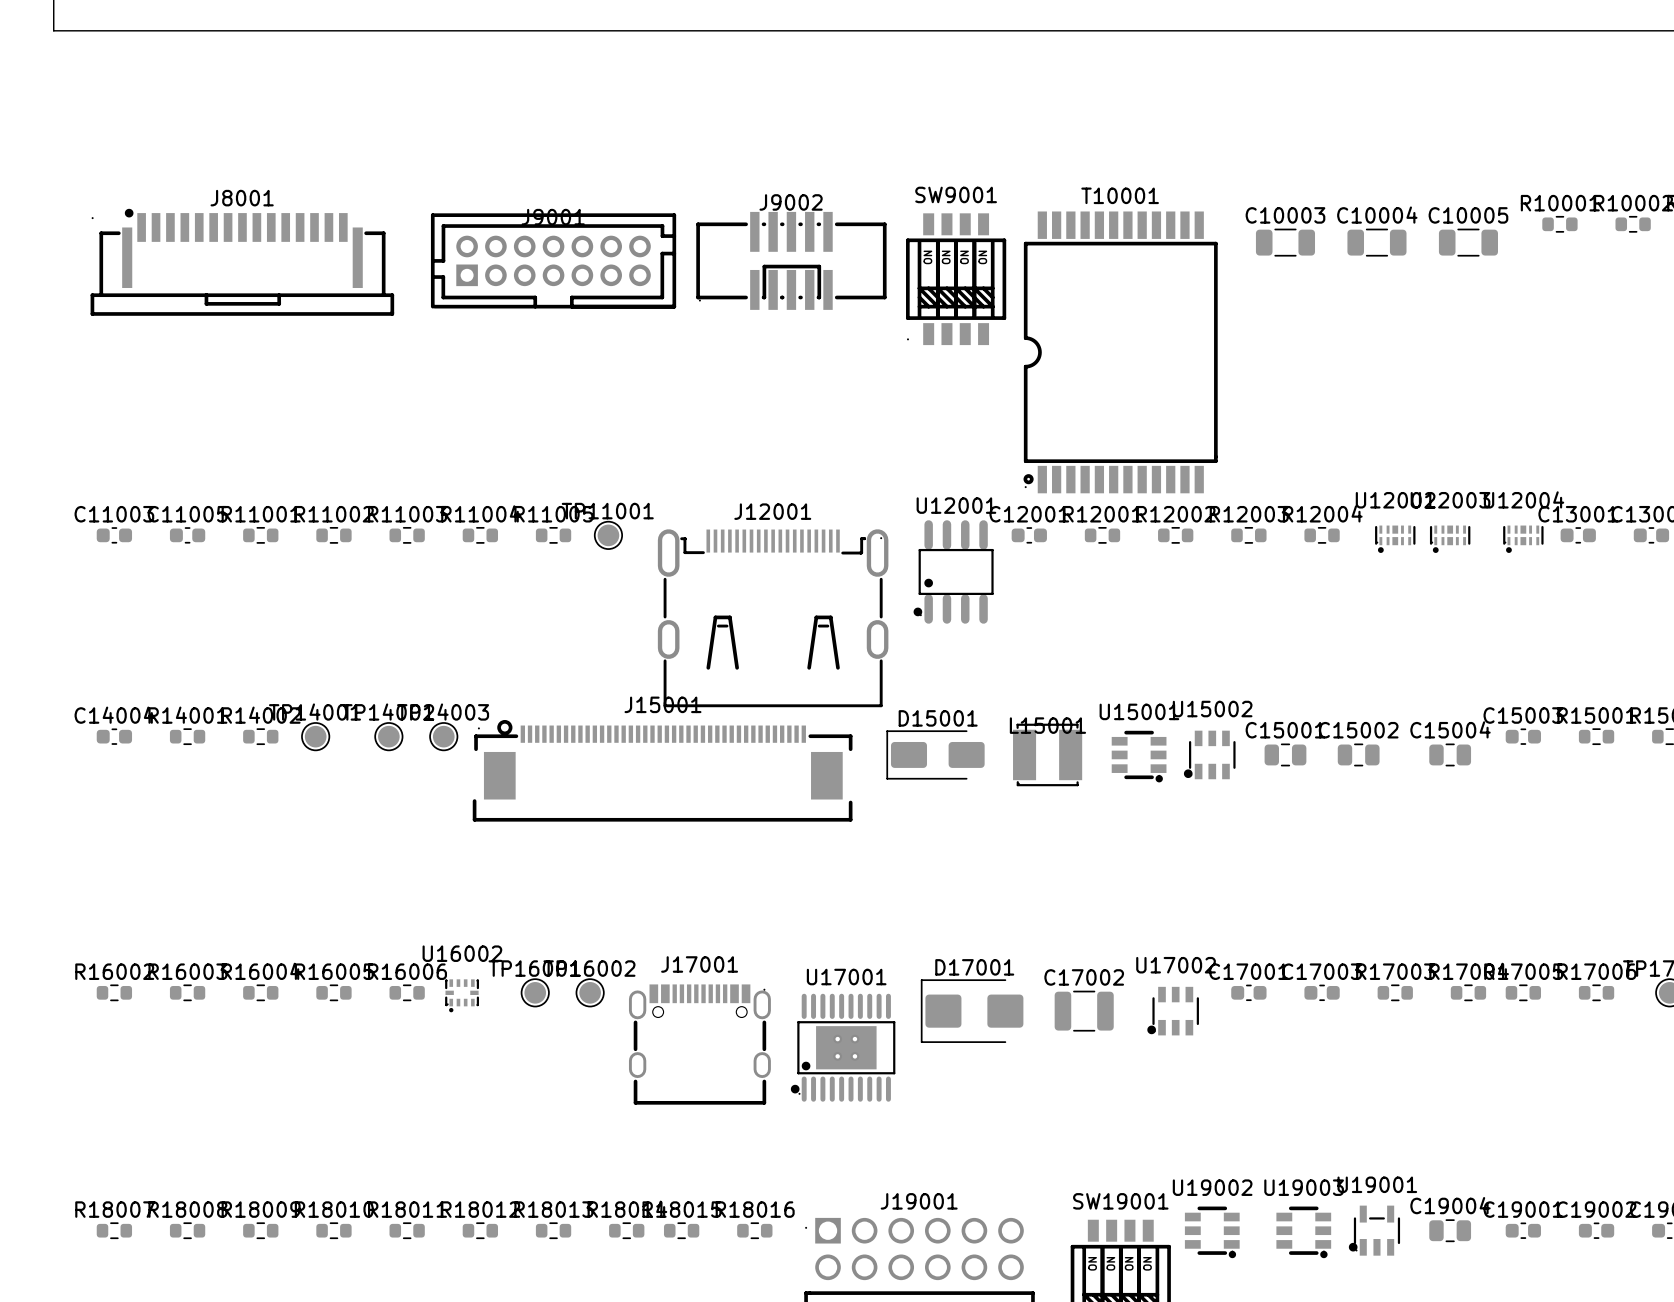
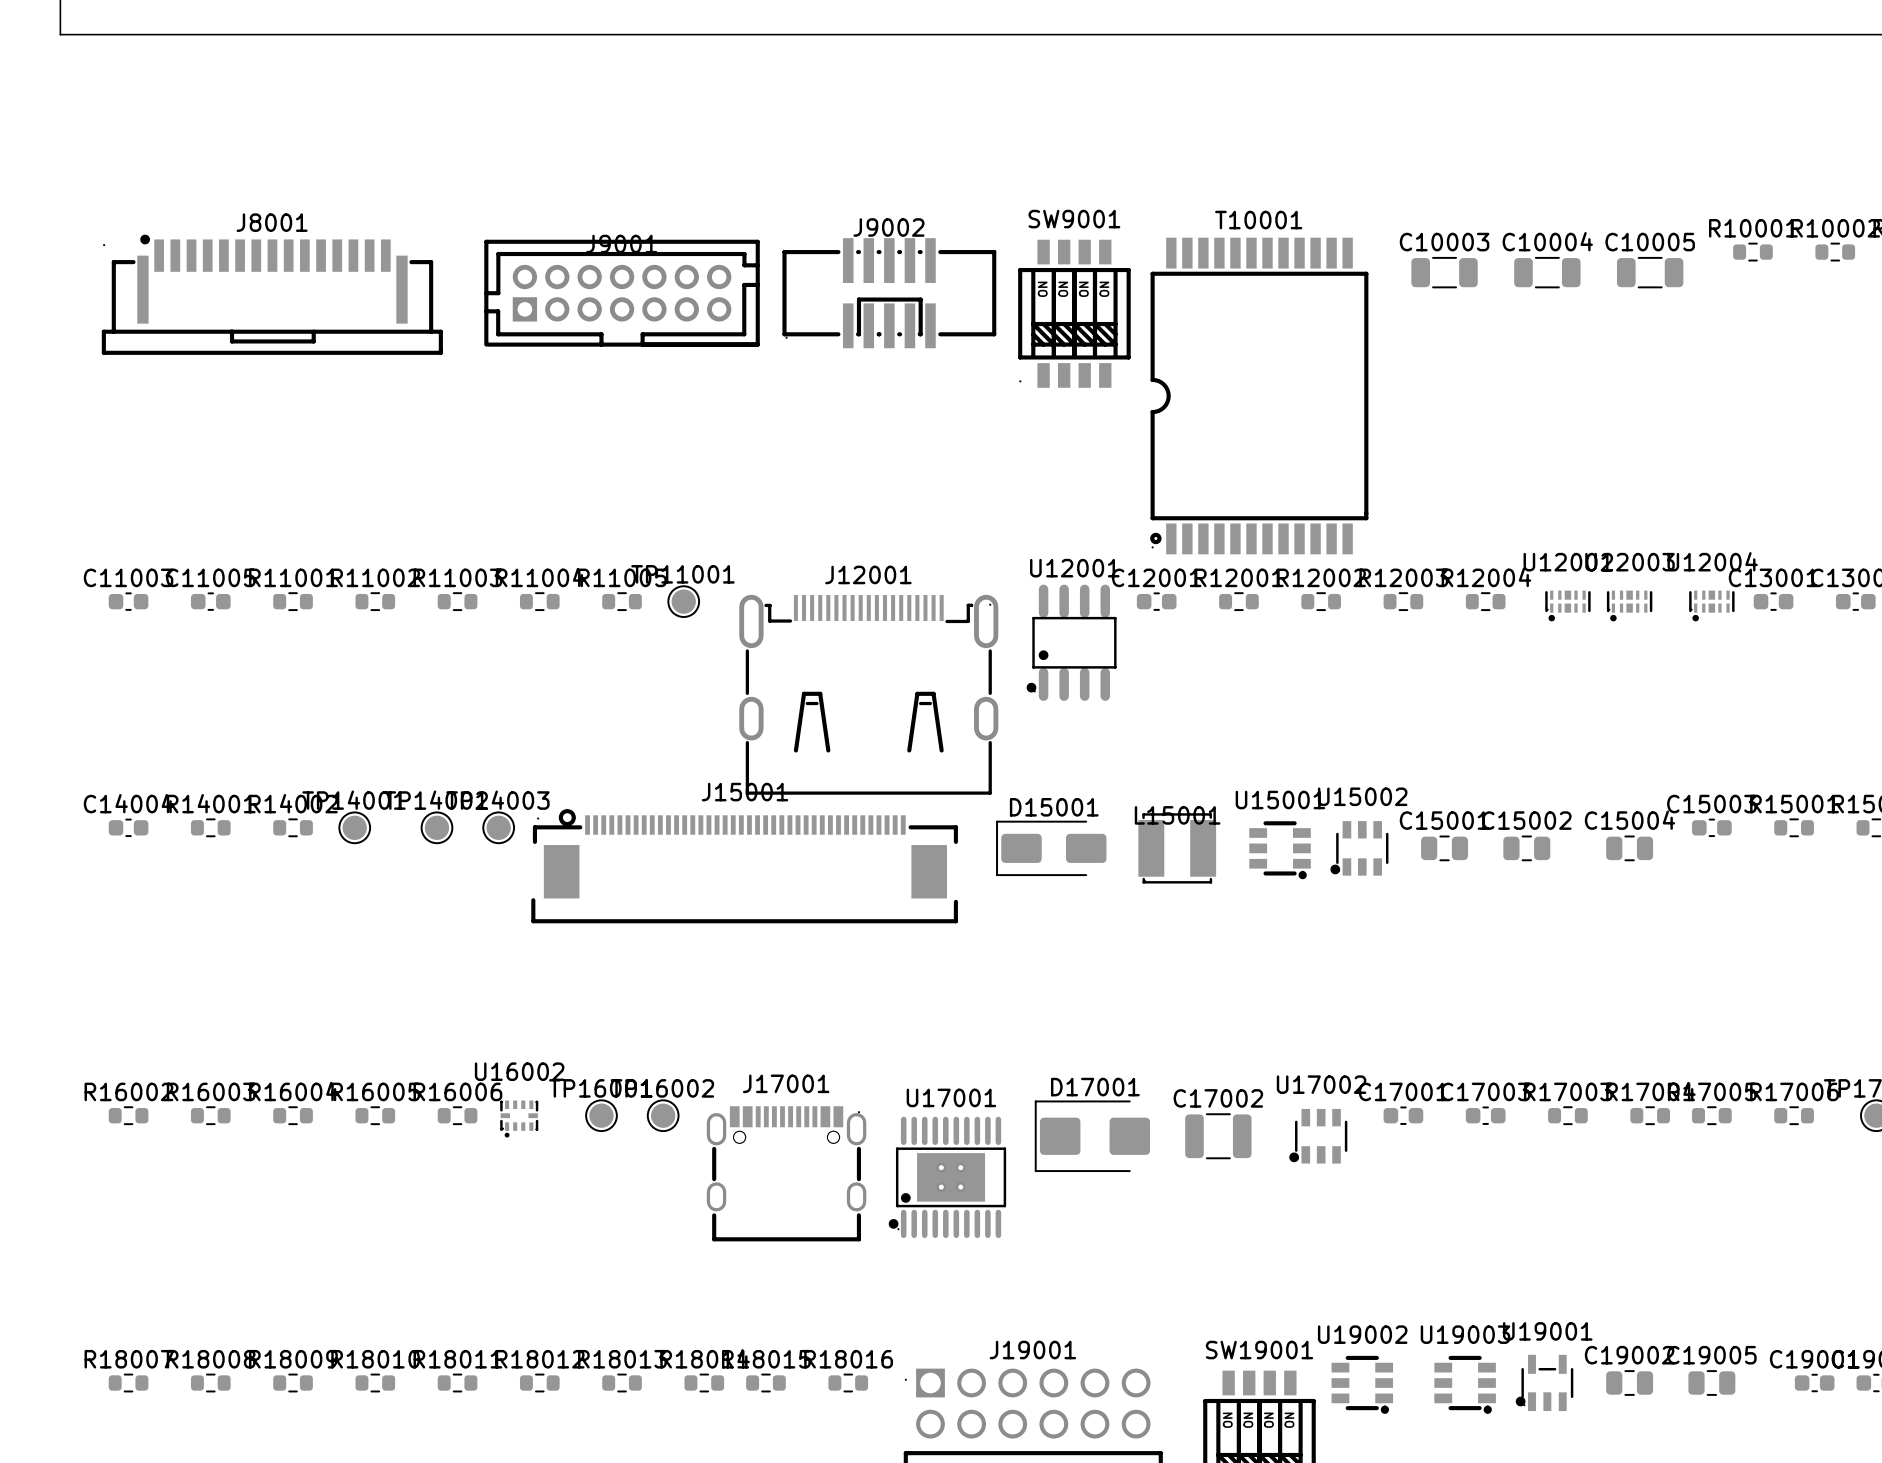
C19004 name: C19004 (1450, 1205) -> C19002 (1629, 1355)
C19001 position: (1523, 1230) -> (1814, 1383)
C19005: none -> (1711, 1383)
C19002: (1596, 1230) -> none

